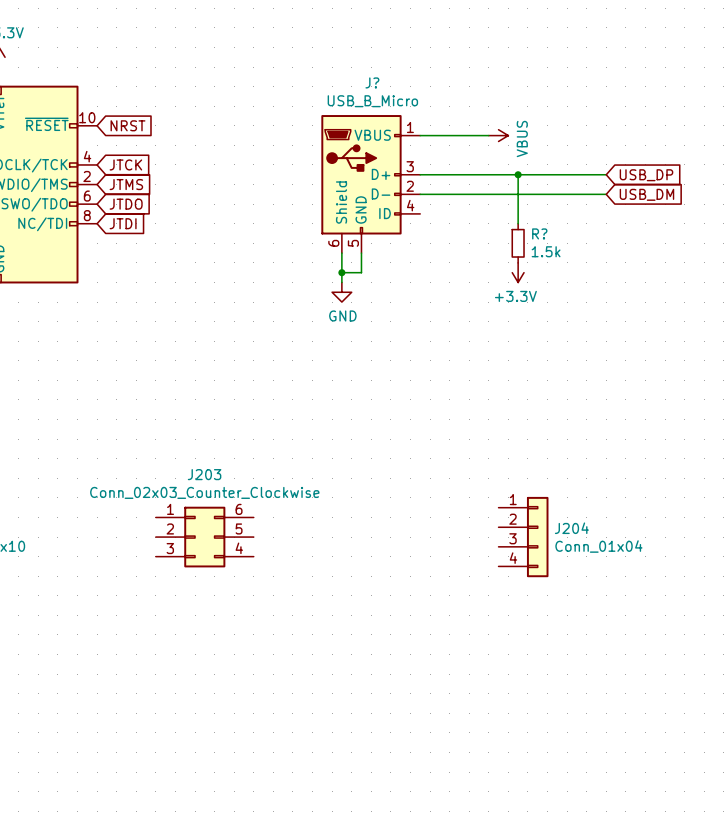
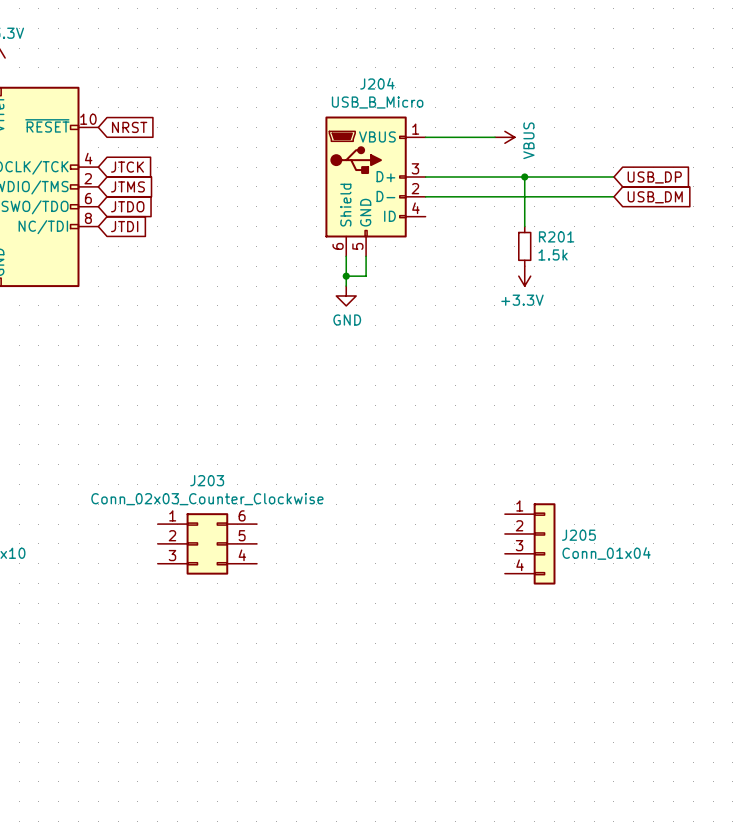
J? name: J? (372, 82) -> J204 (377, 83)
R? name: R? (539, 233) -> R201 (556, 236)
J204 name: J204 (571, 528) -> J205 (578, 535)

